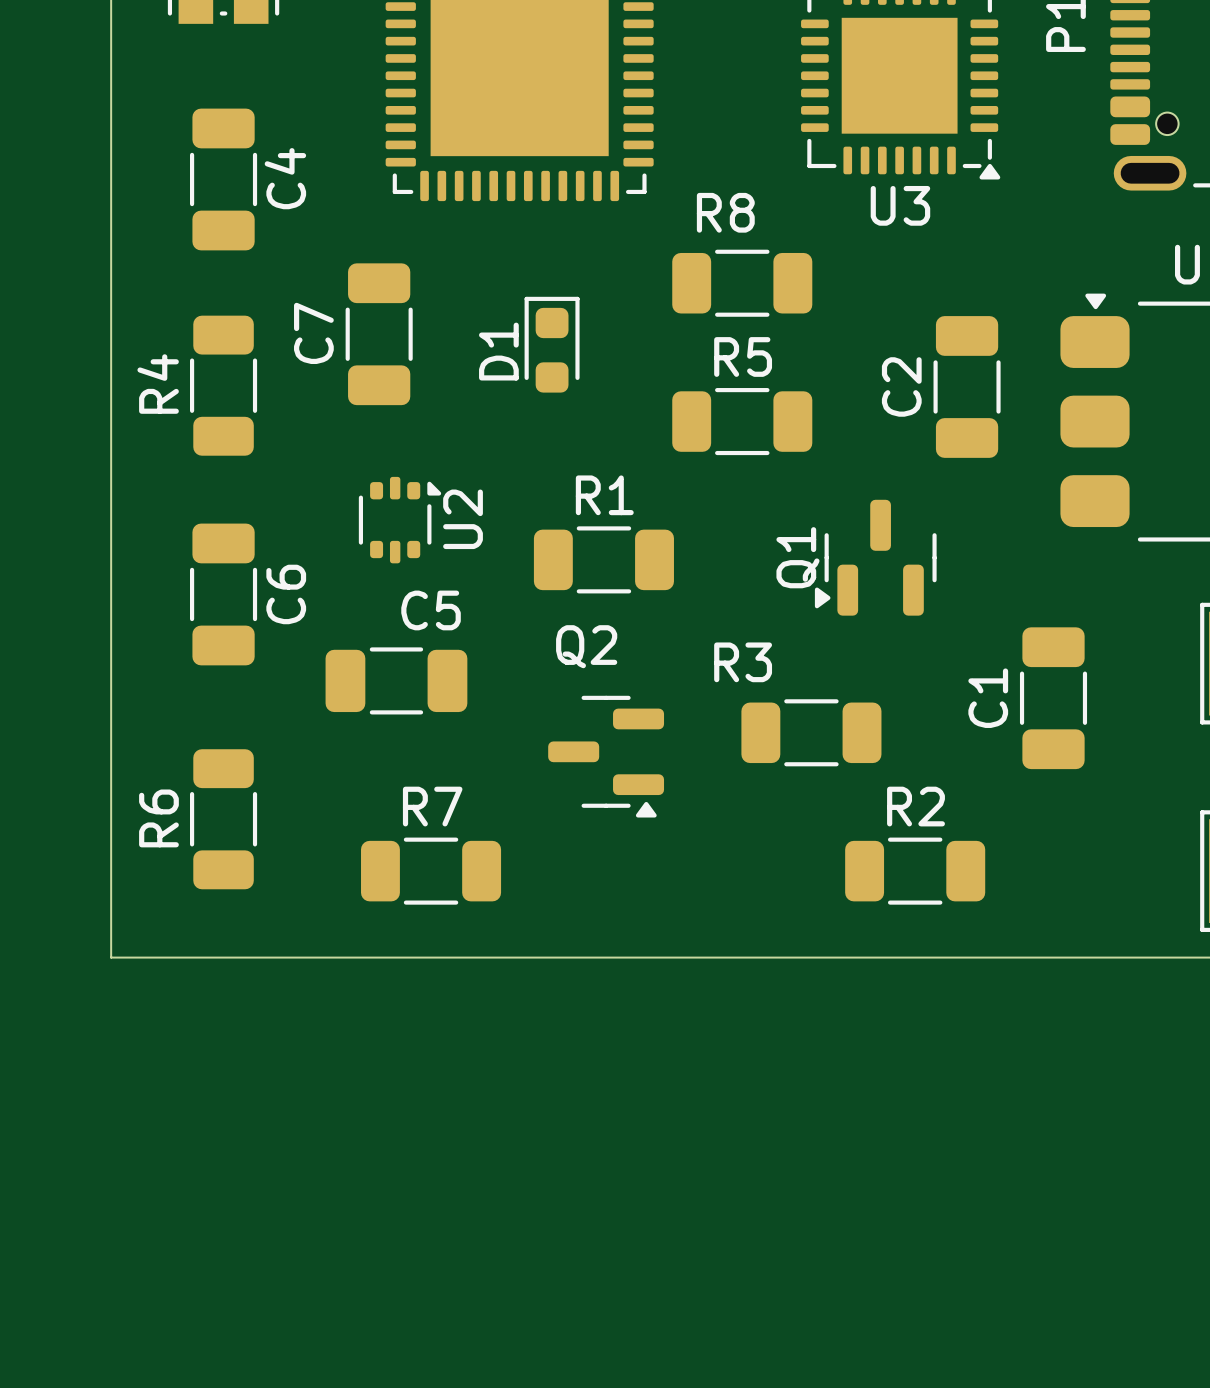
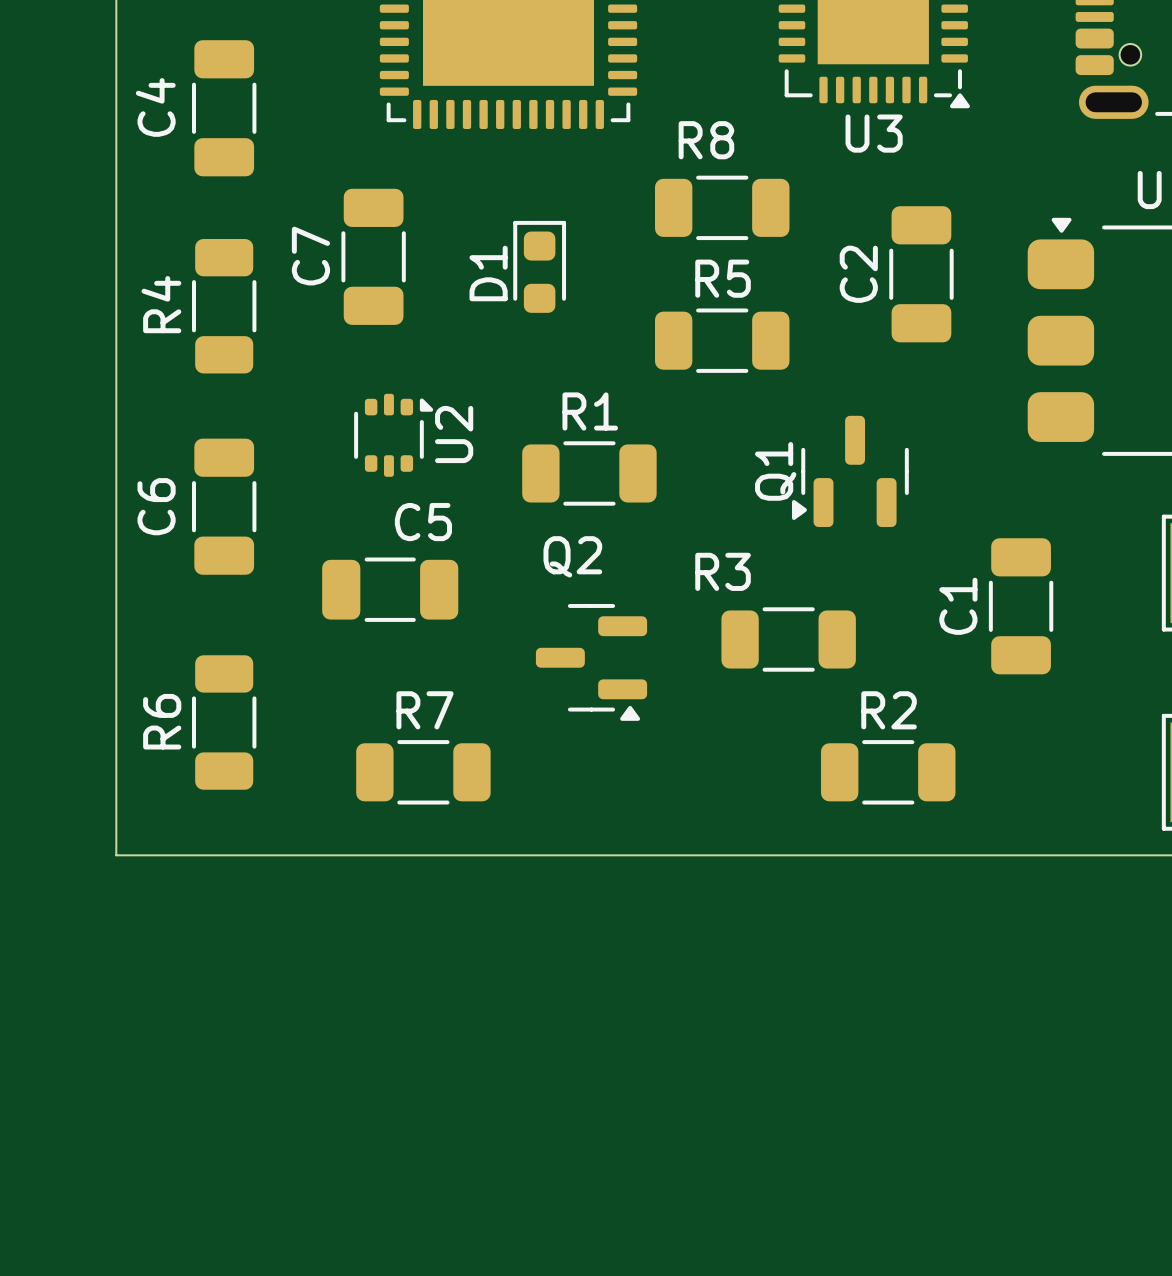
C4 name position: C4 (285, 178) -> C4 (155, 107)
C2 position: (967, 386) -> (921, 274)
C6 name position: C6 (286, 594) -> C6 (156, 506)

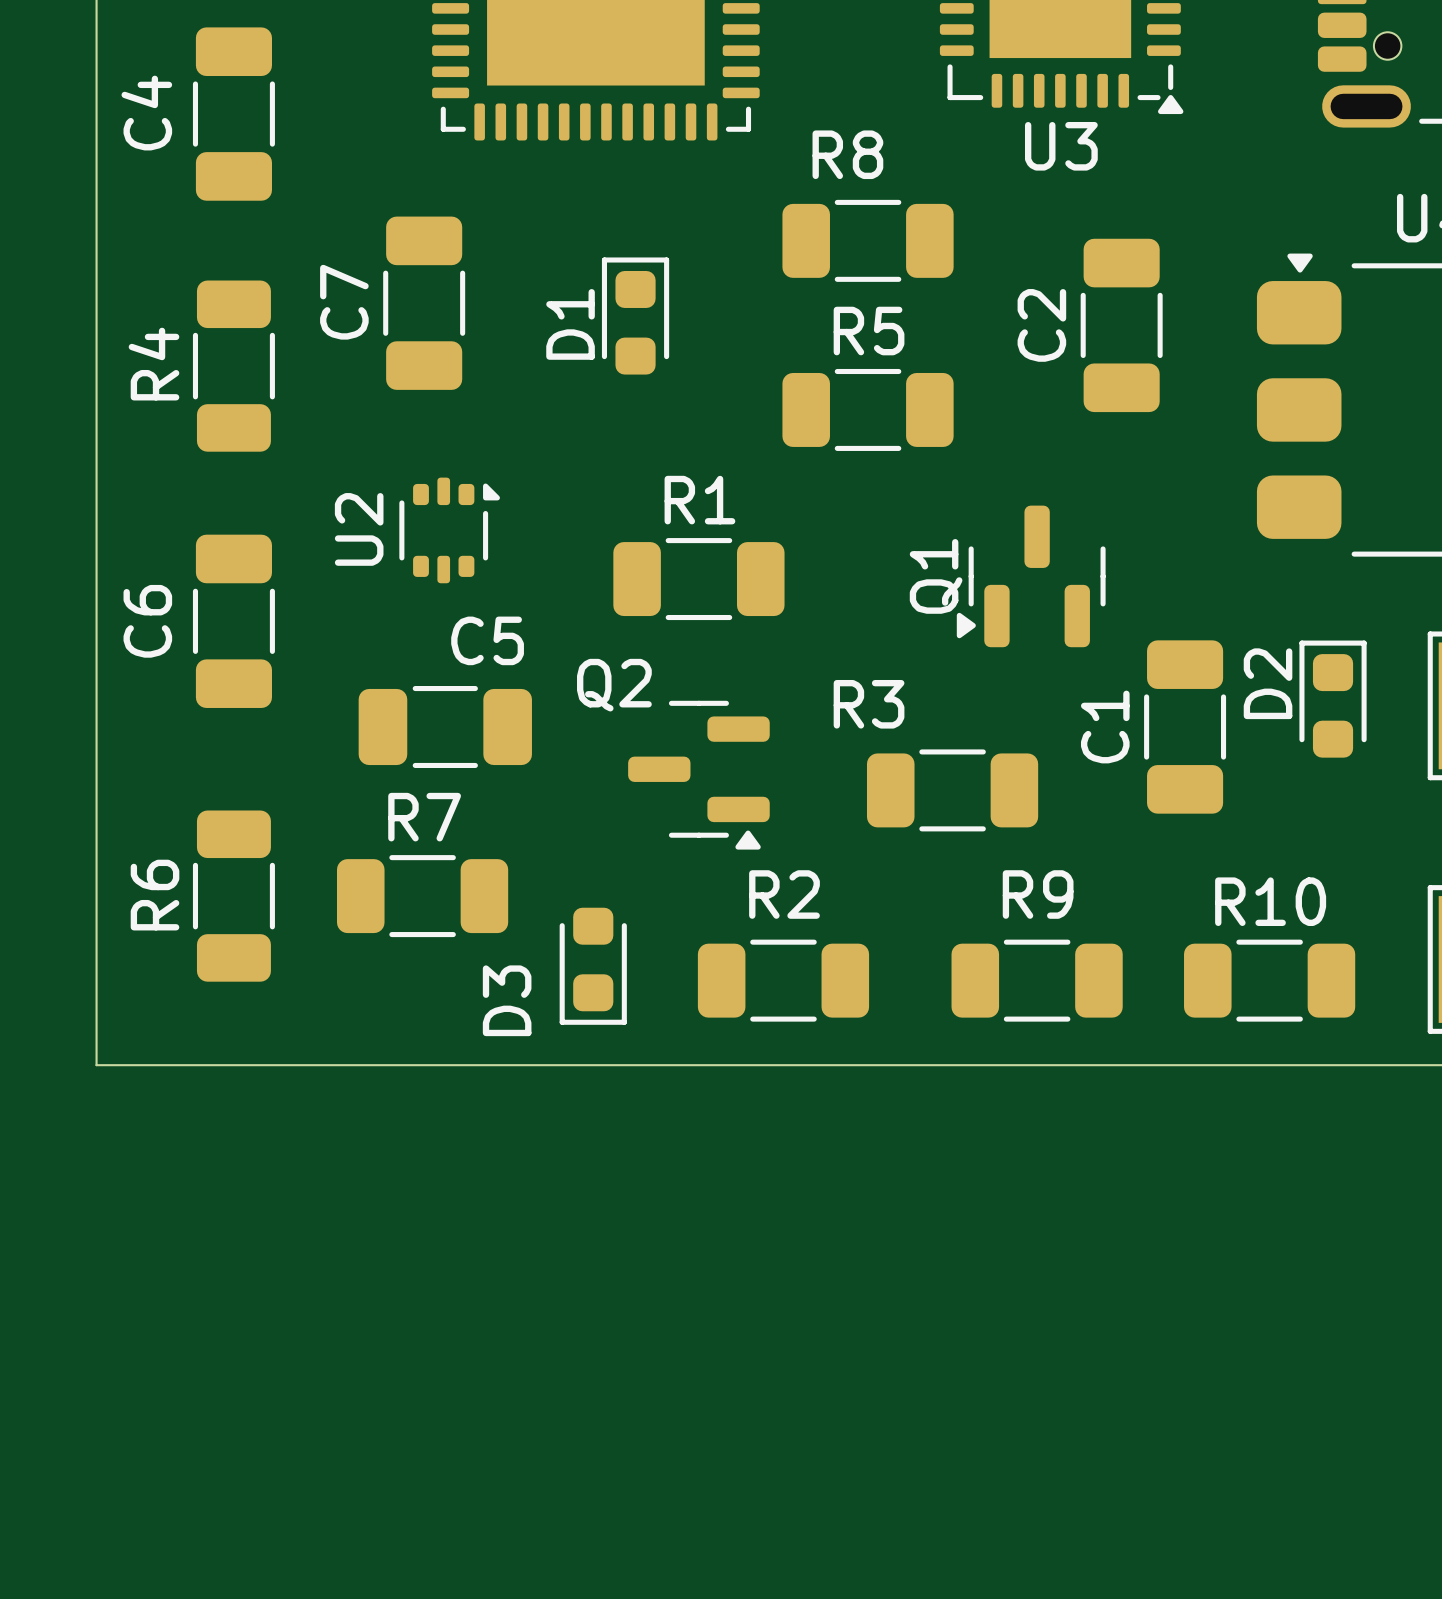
U2 name position: U2 (454, 434) -> U2 (359, 529)
Q2 name position: Q2 (572, 556) -> Q2 (614, 685)
D2: none -> (1333, 699)
C1 position: (1021, 606) -> (1185, 727)
Q2 position: (591, 662) -> (698, 775)
R2 name position: R2 (889, 710) -> R2 (784, 894)
R7 position: (423, 772) -> (422, 896)
R2 position: (888, 772) -> (783, 980)
D3: none -> (593, 966)
R9: none -> (1037, 980)
R10: none -> (1269, 980)

